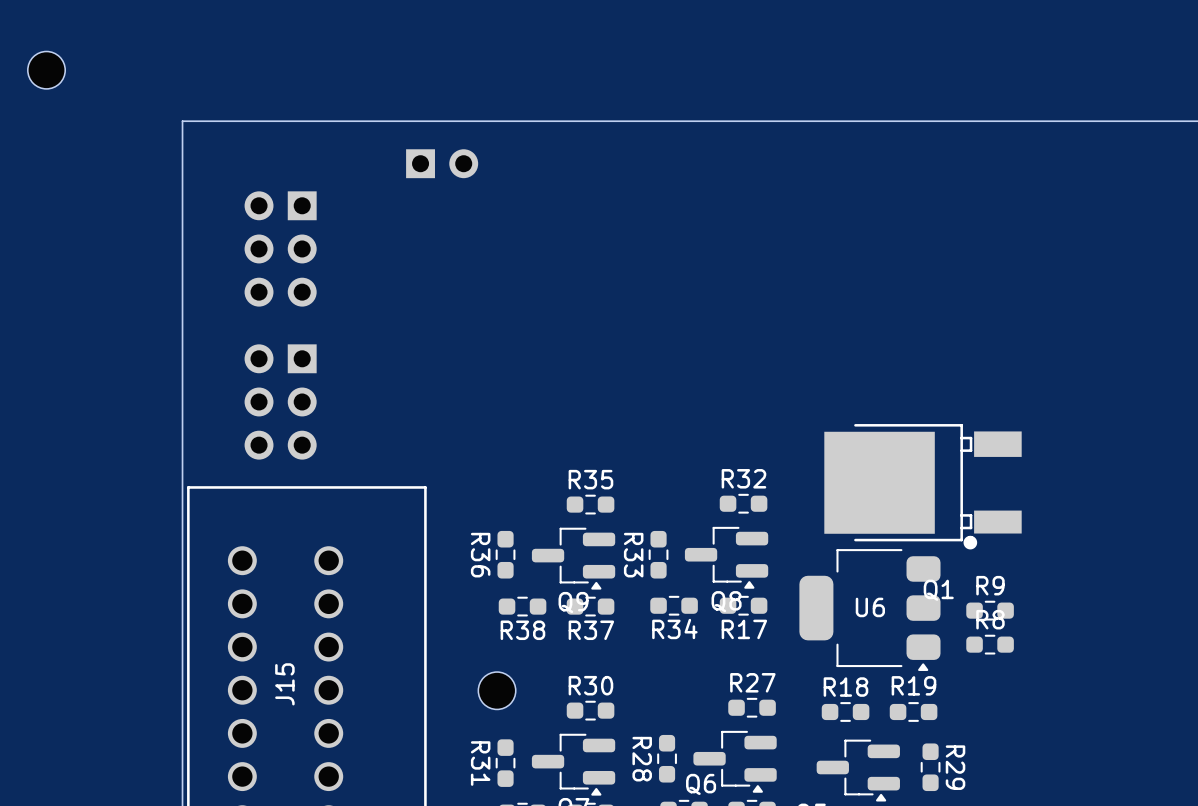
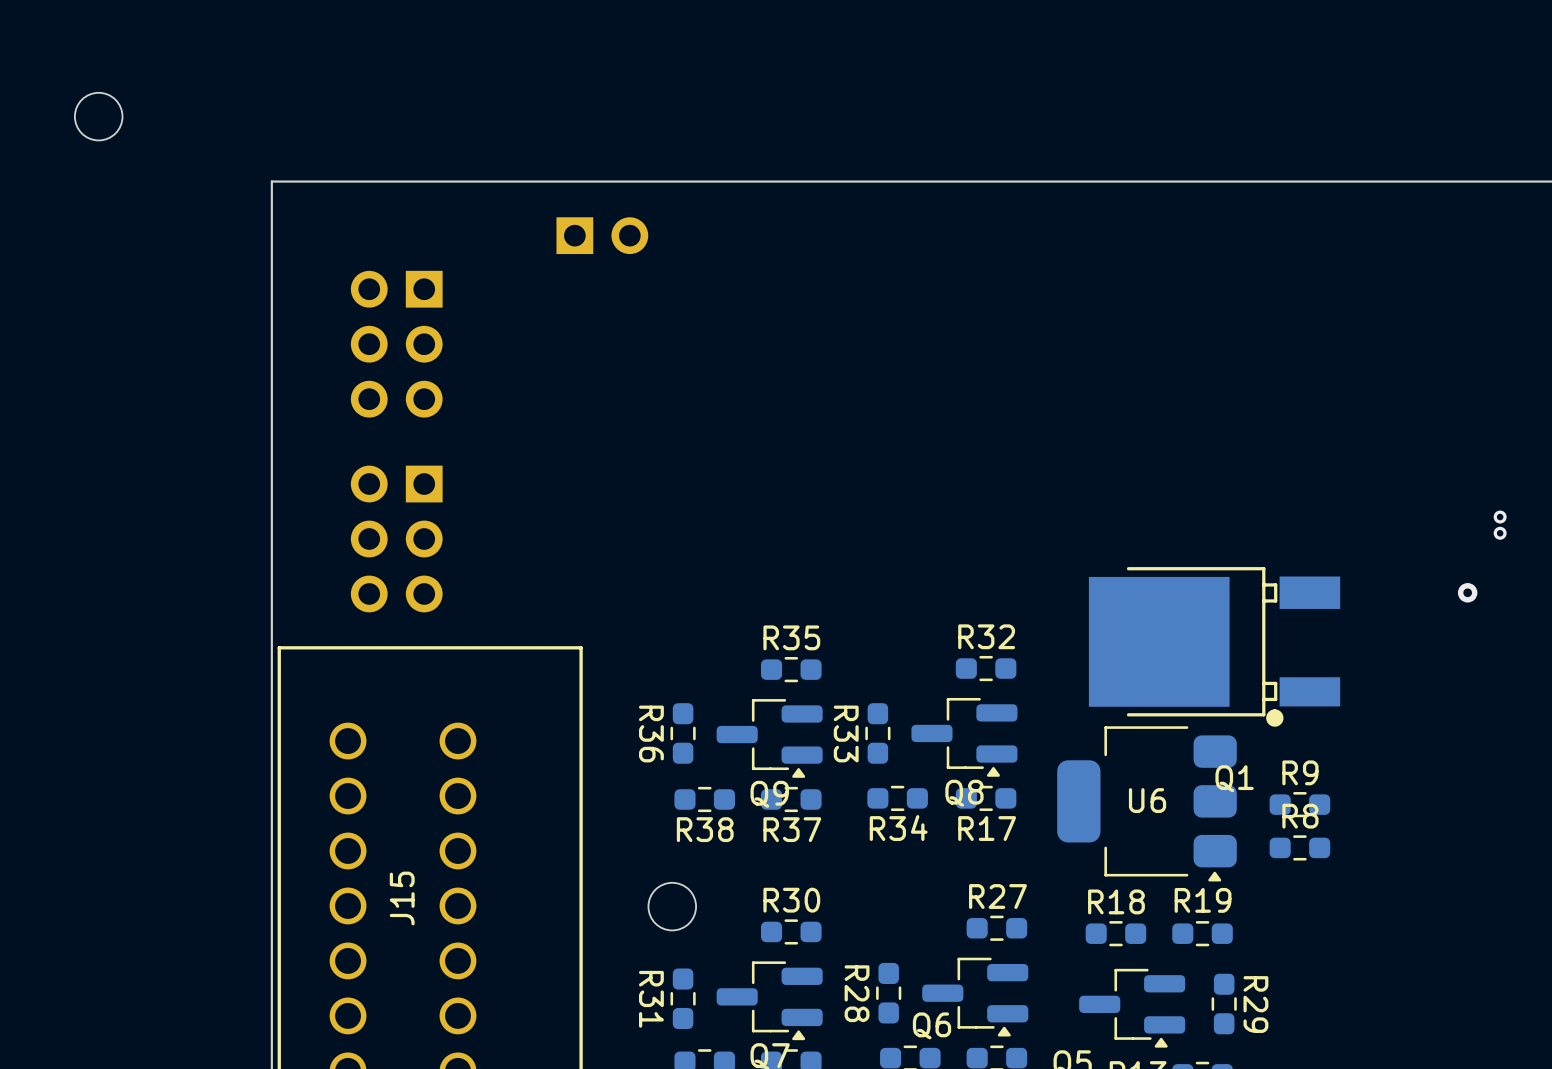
via: none -> (1500, 517)
via: none -> (1500, 533)
via: none -> (1467, 592)

